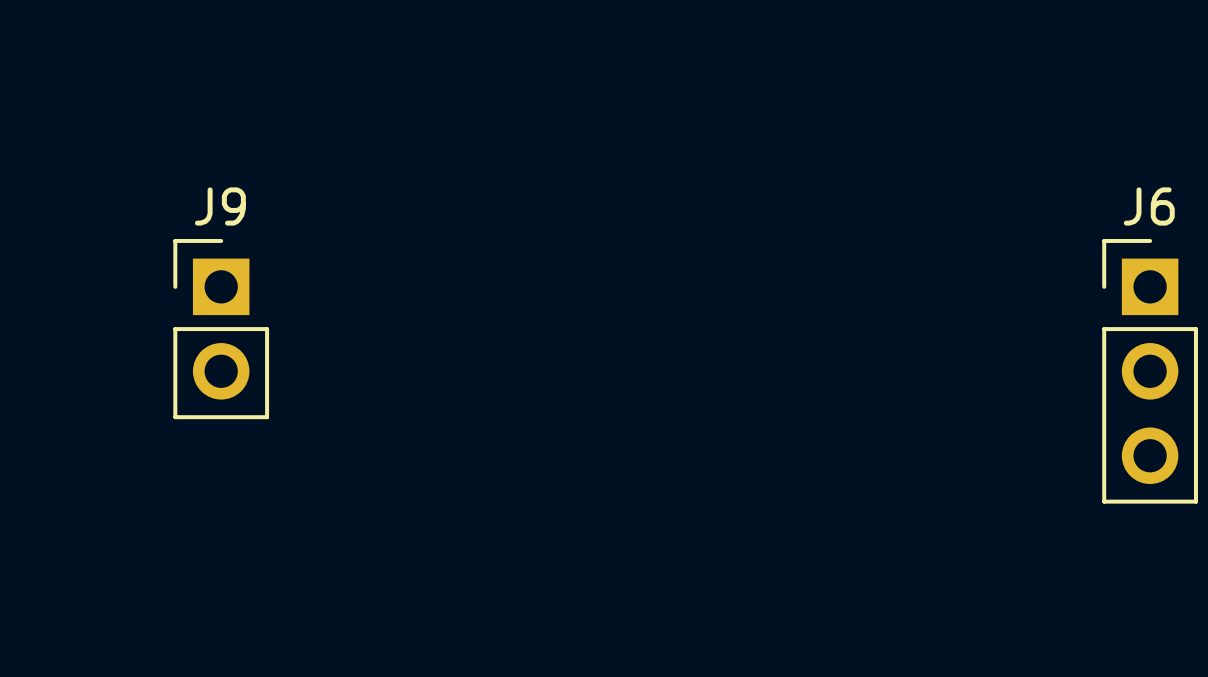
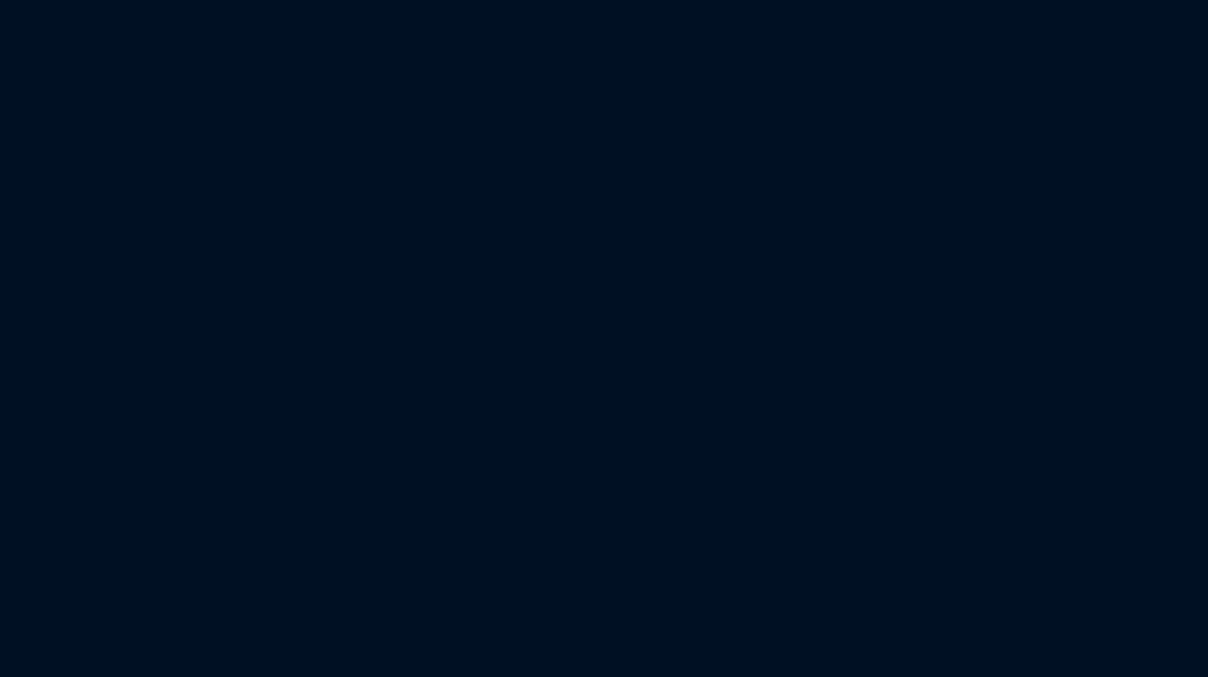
J9: (221, 329) -> none
J6: (1150, 371) -> none

